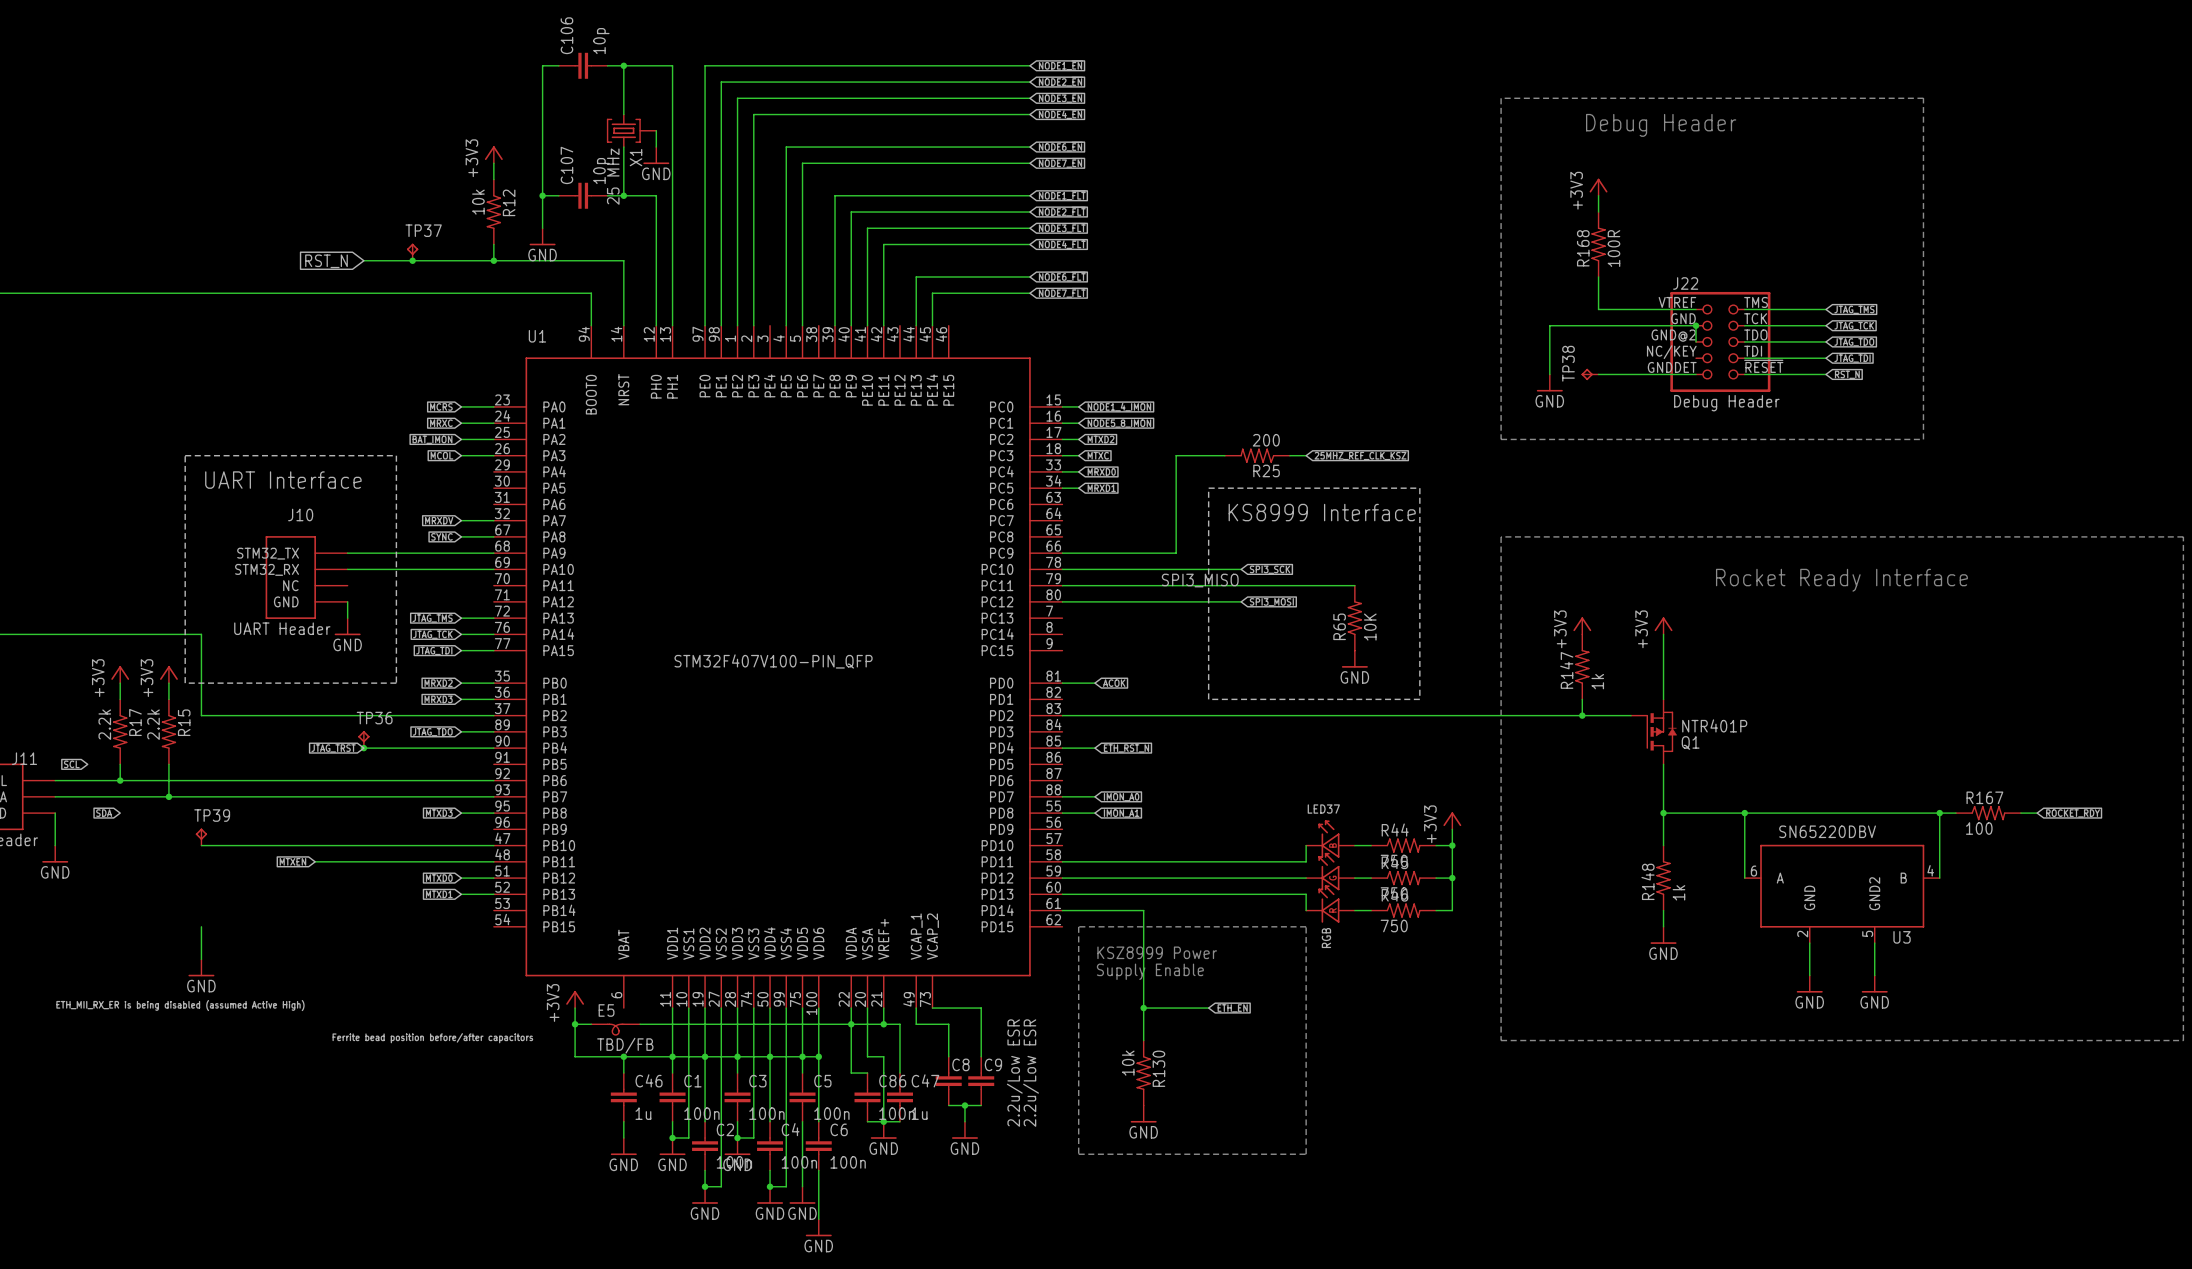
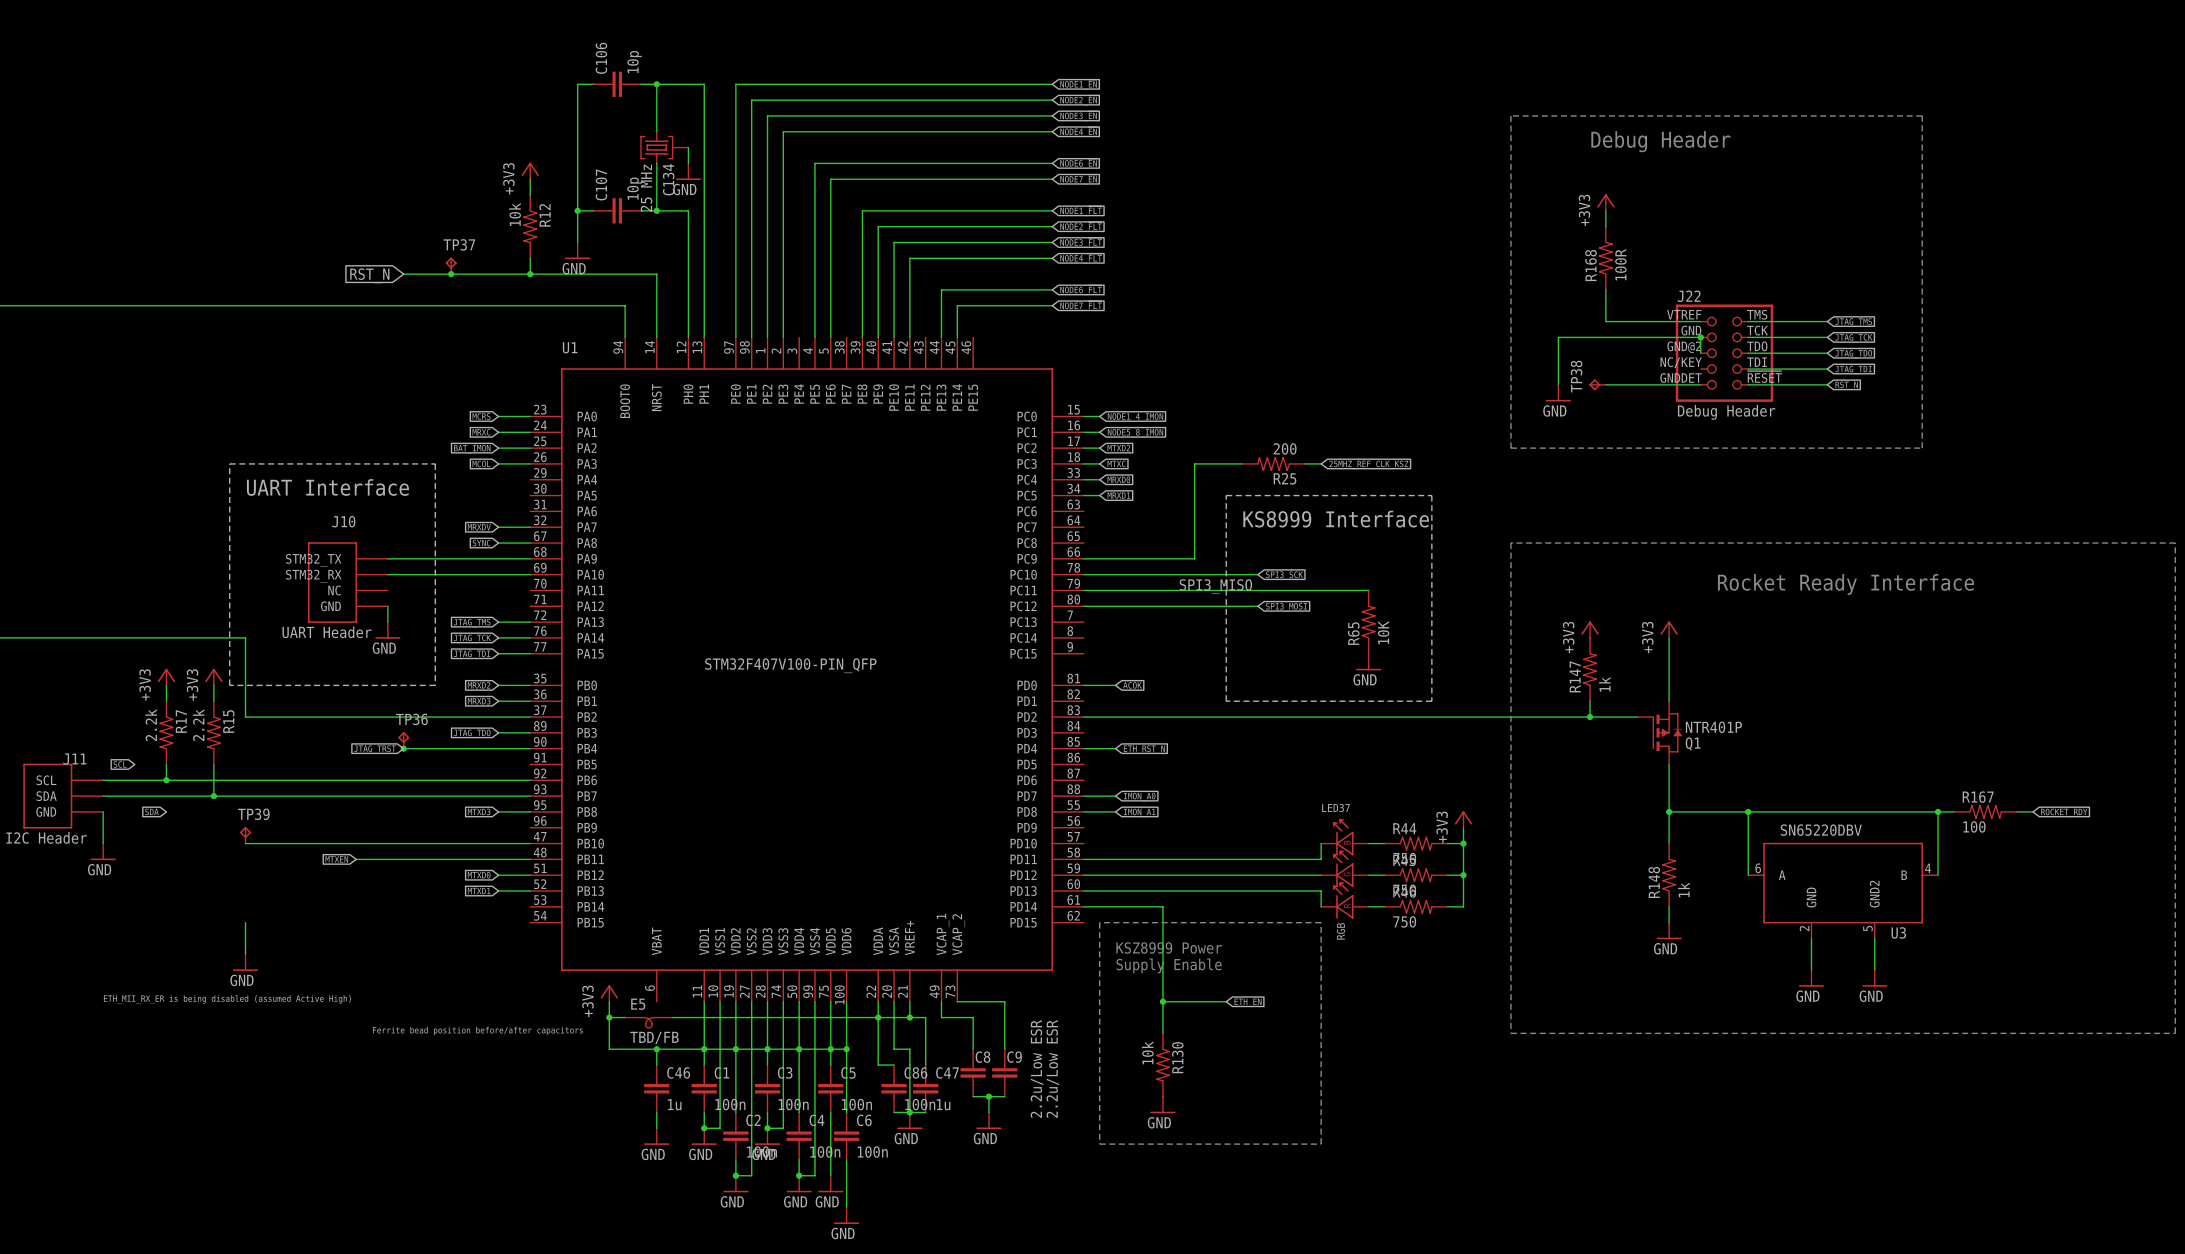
X1 name: X1 (636, 157) -> C134 (668, 179)

